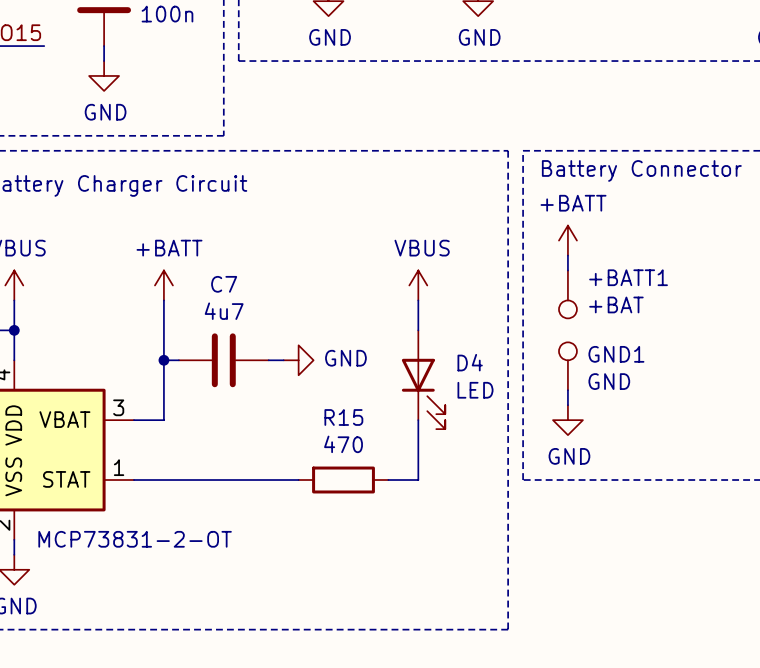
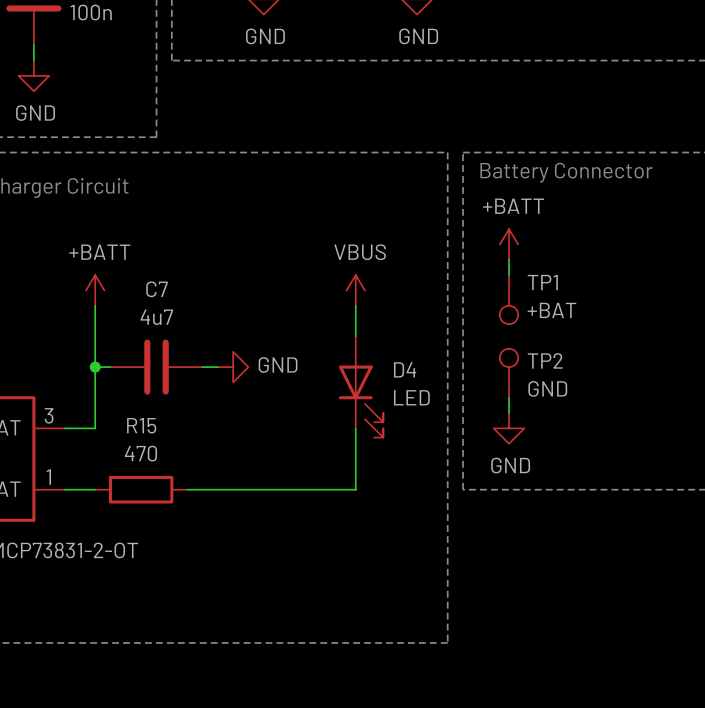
+BATT1 name: +BATT1 (628, 277) -> TP1 (542, 282)
GND1 name: GND1 (616, 354) -> TP2 (545, 360)
wire: (163, 480) (253, 480) -> (233, 489) (325, 489)
R15 position: (343, 480) -> (141, 489)

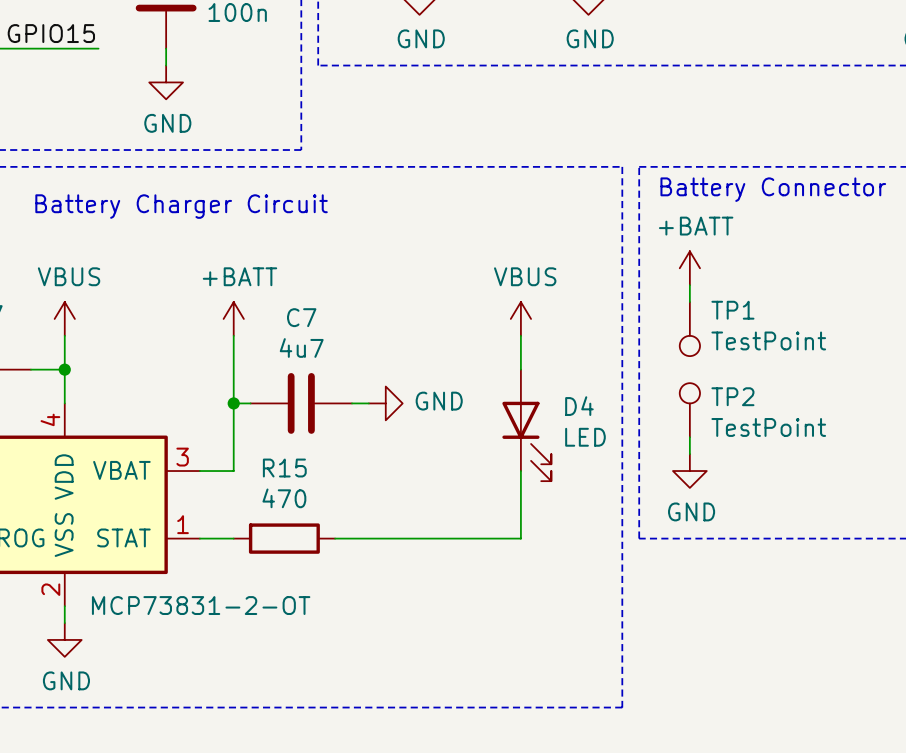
TP1 value: +BAT (551, 310) -> TestPoint (768, 340)
TP2 value: GND (547, 388) -> TestPoint (768, 427)

